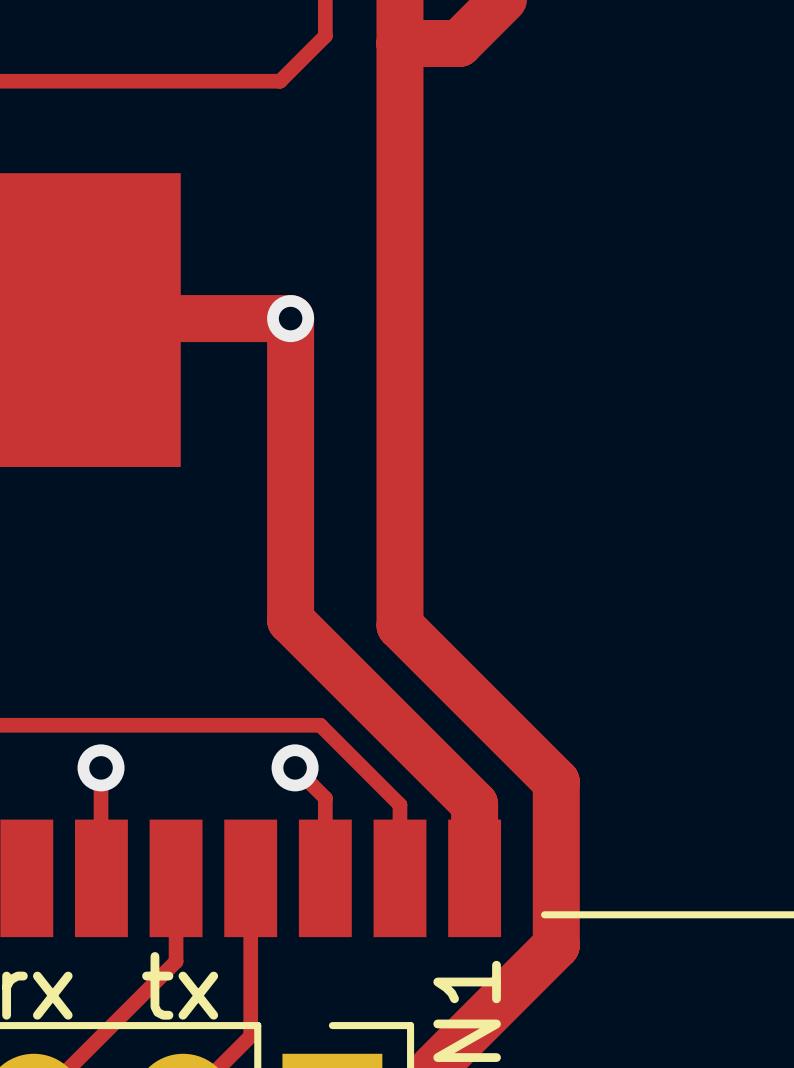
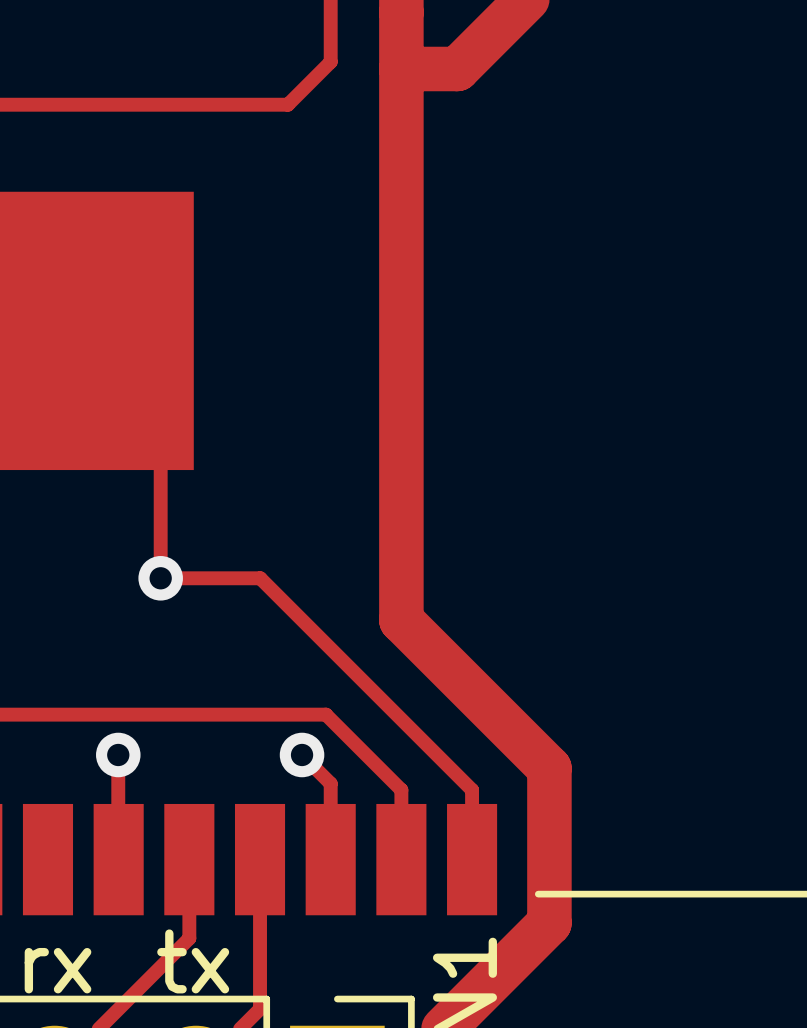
via position: (290, 318) -> (160, 578)
track: (33, 320) (290, 318) (290, 620) -> (160, 436) (160, 578) (260, 578) (297, 615)
track width: thick (290, 620) (474, 804) (474, 878) -> thin (297, 615) (472, 789) (472, 859)

